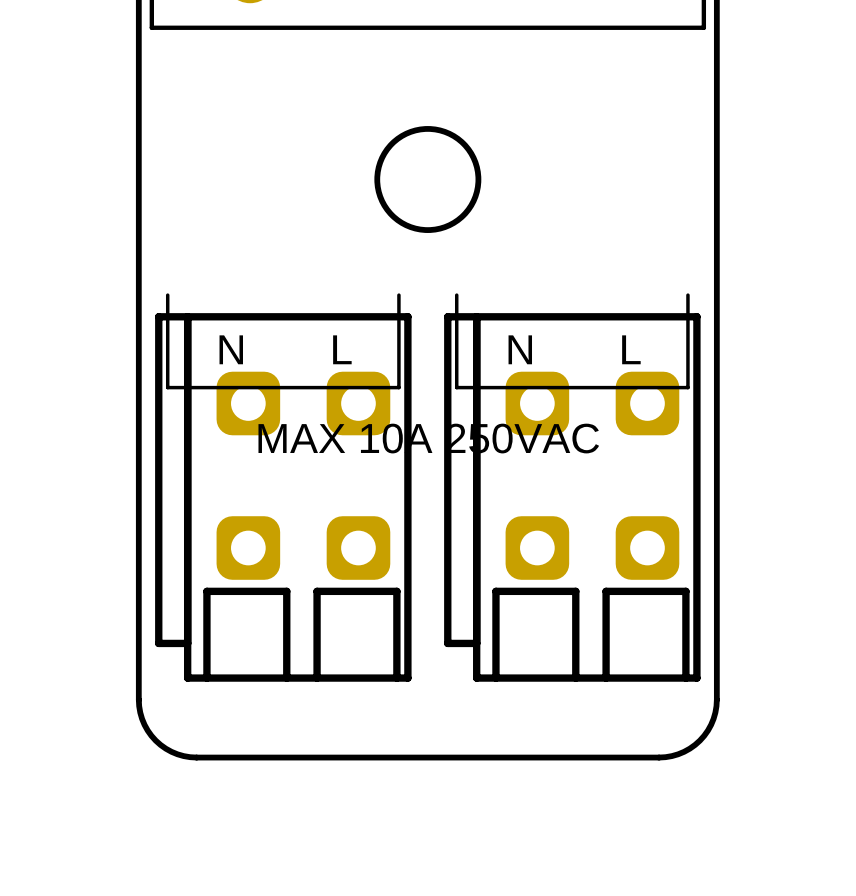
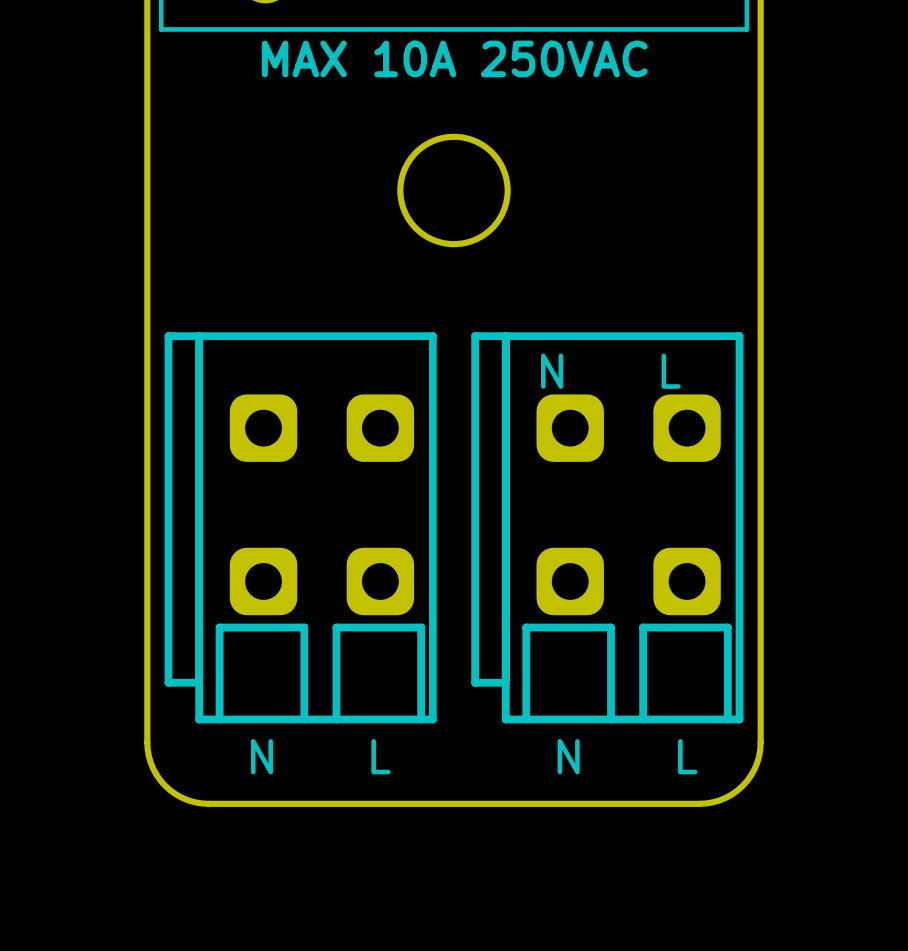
line: (167, 295) (167, 387) (398, 387) (398, 295) -> none
line: (456, 295) (456, 387) (687, 387) (687, 295) -> none
text: N (231, 349) -> none
text: L (342, 349) -> none
text position: MAX 10A 250VAC (428, 438) -> MAX 10A 250VAC (454, 58)
text: none -> N (261, 756)
text: none -> L (380, 756)
text: none -> N (568, 756)
text: none -> L (687, 756)

